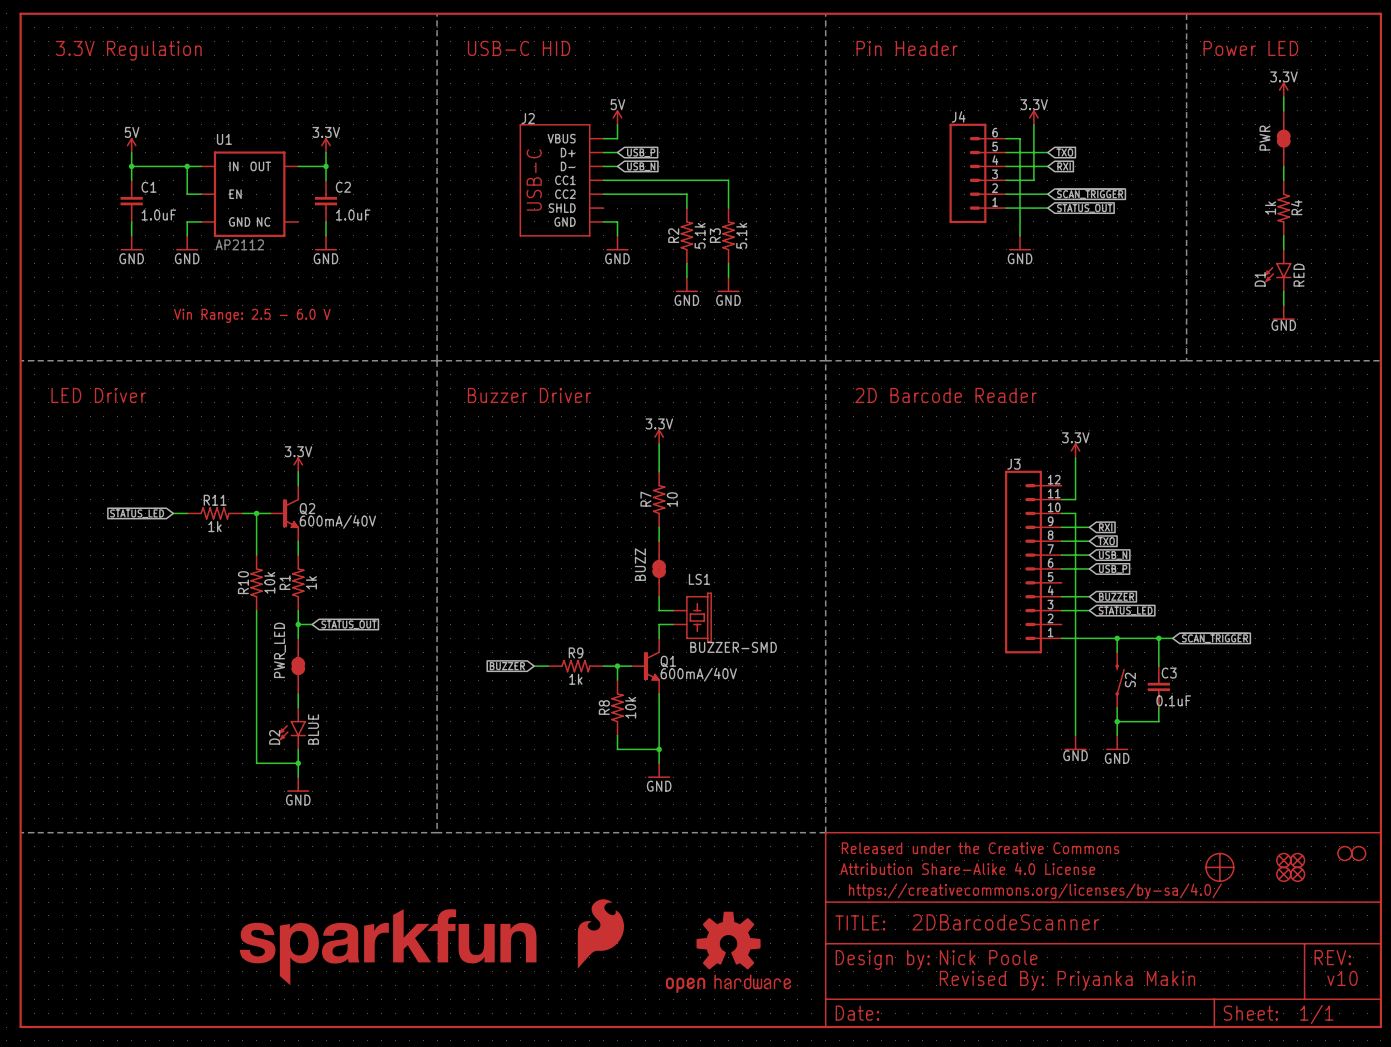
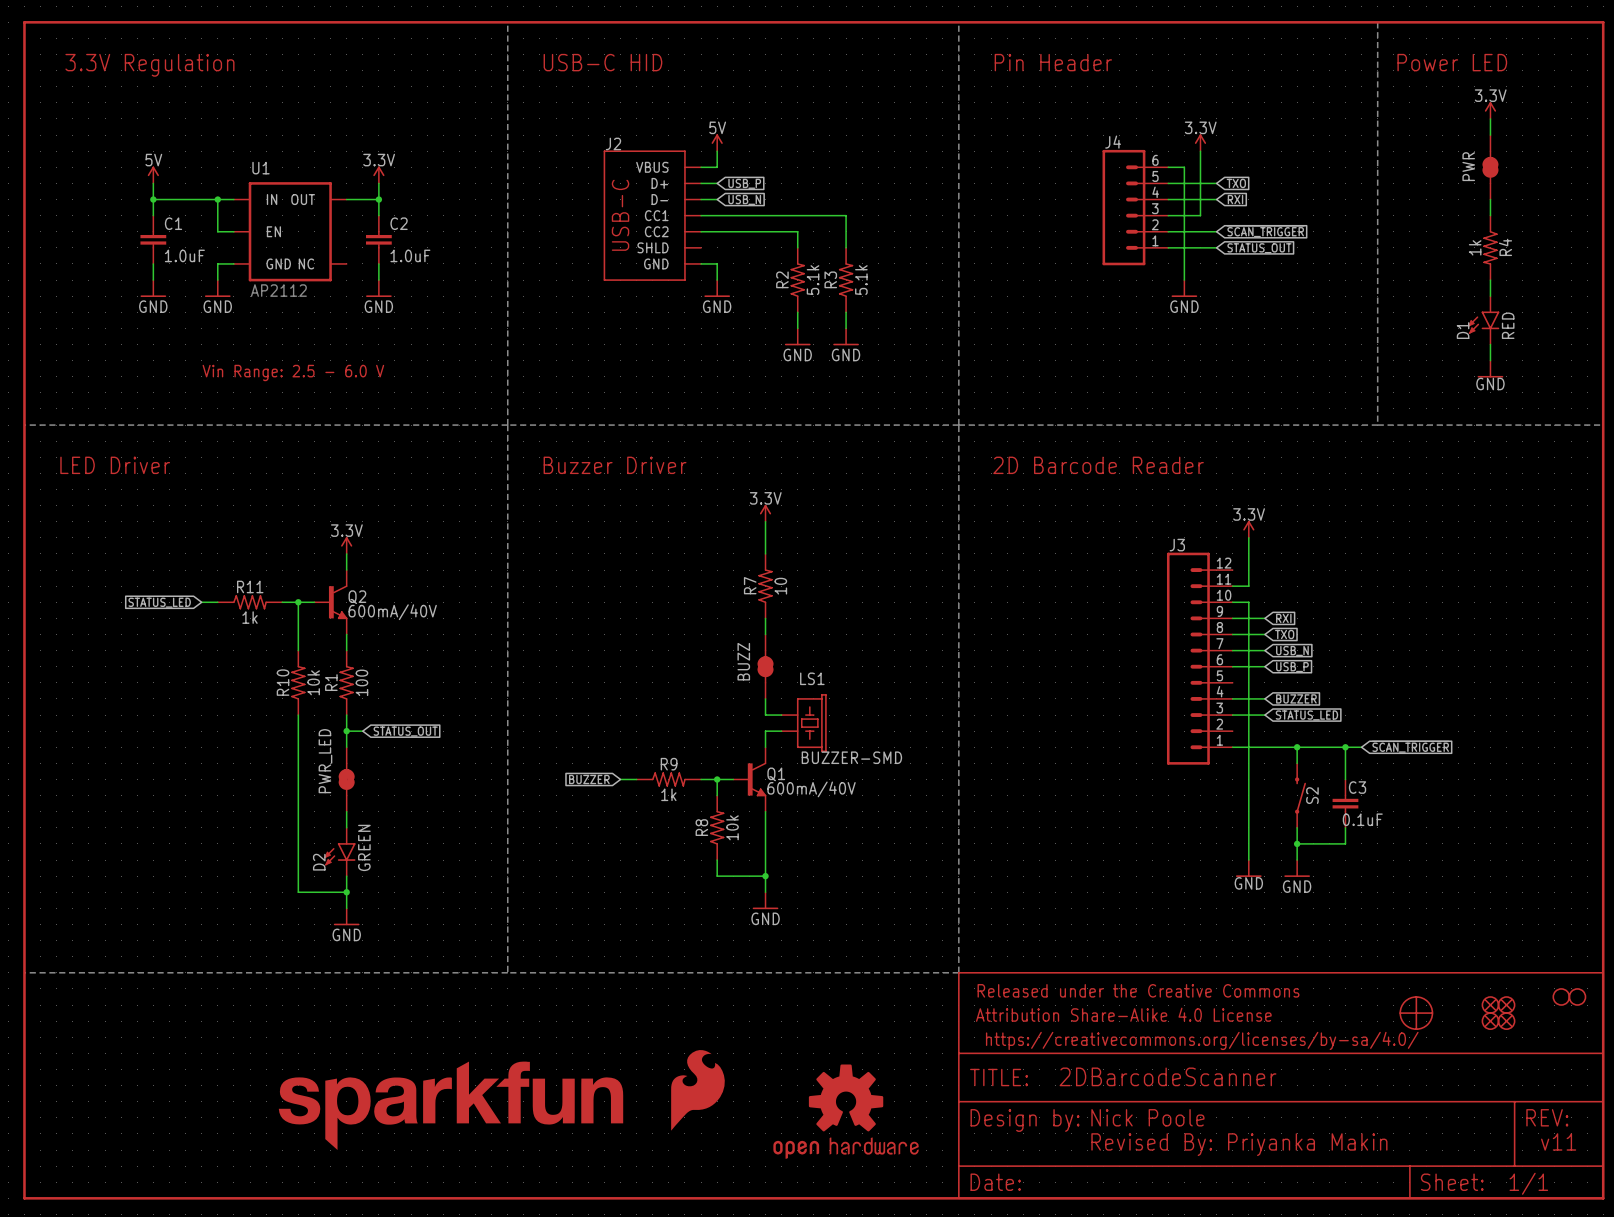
R1 value: 1k (311, 582) -> 100 (361, 682)
D2 value: BLUE (313, 729) -> GREEN (364, 847)
text: v10 (1342, 978) -> v11 (1558, 1141)

